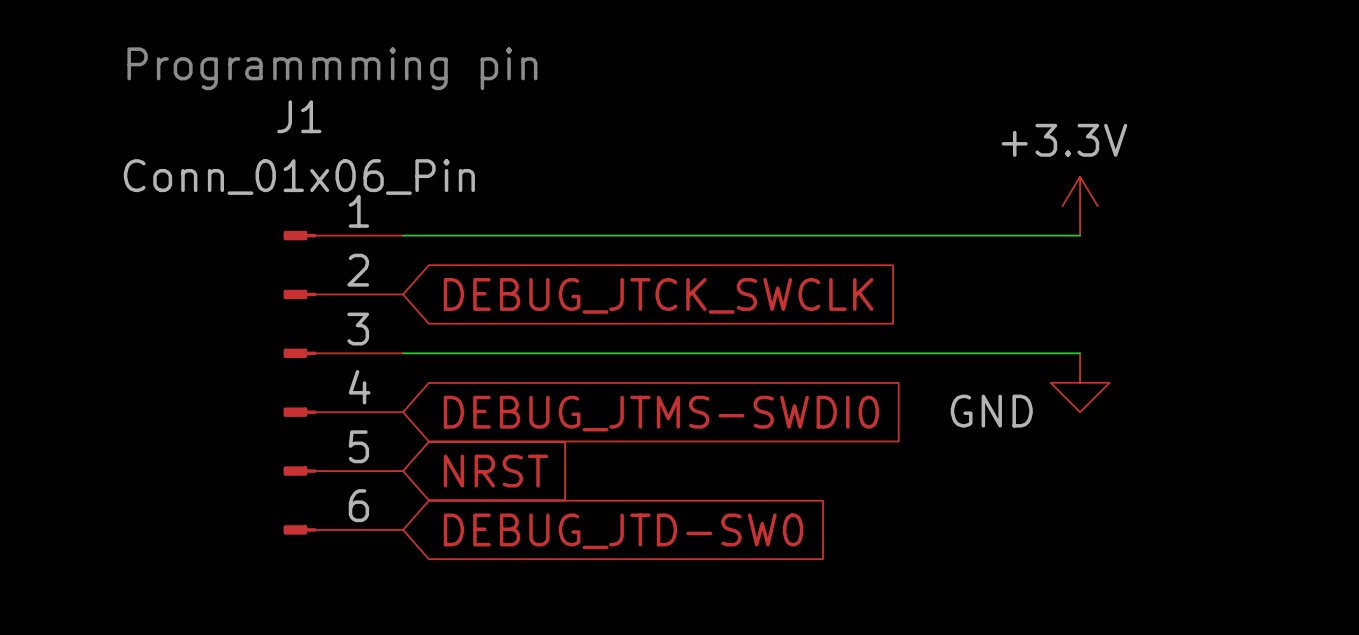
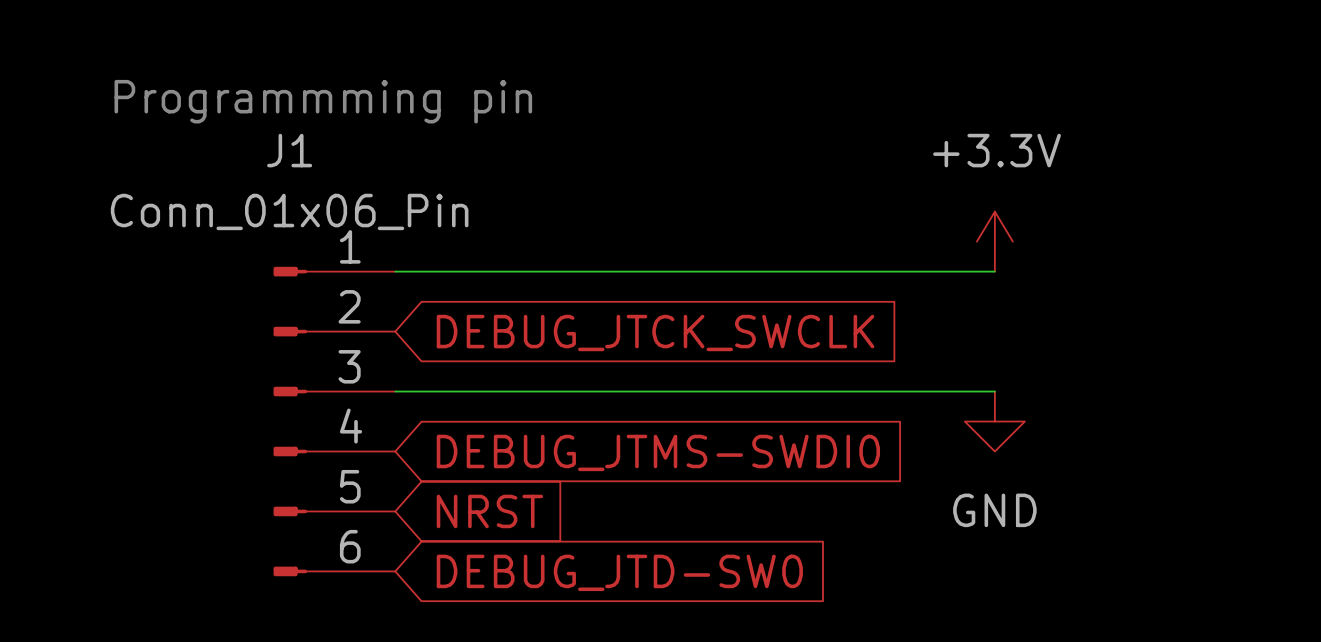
power symbol text position: +3.3V (1064, 140) -> +3.3V (997, 150)
power symbol position: +3.3V (1080, 206) -> +3.3V (994, 241)
wire: (991, 235) (1080, 235) -> none
wire: (991, 353) (1080, 353) -> none
power symbol position: GND (1080, 382) -> GND (994, 421)
power symbol text position: GND (991, 411) -> GND (994, 510)

